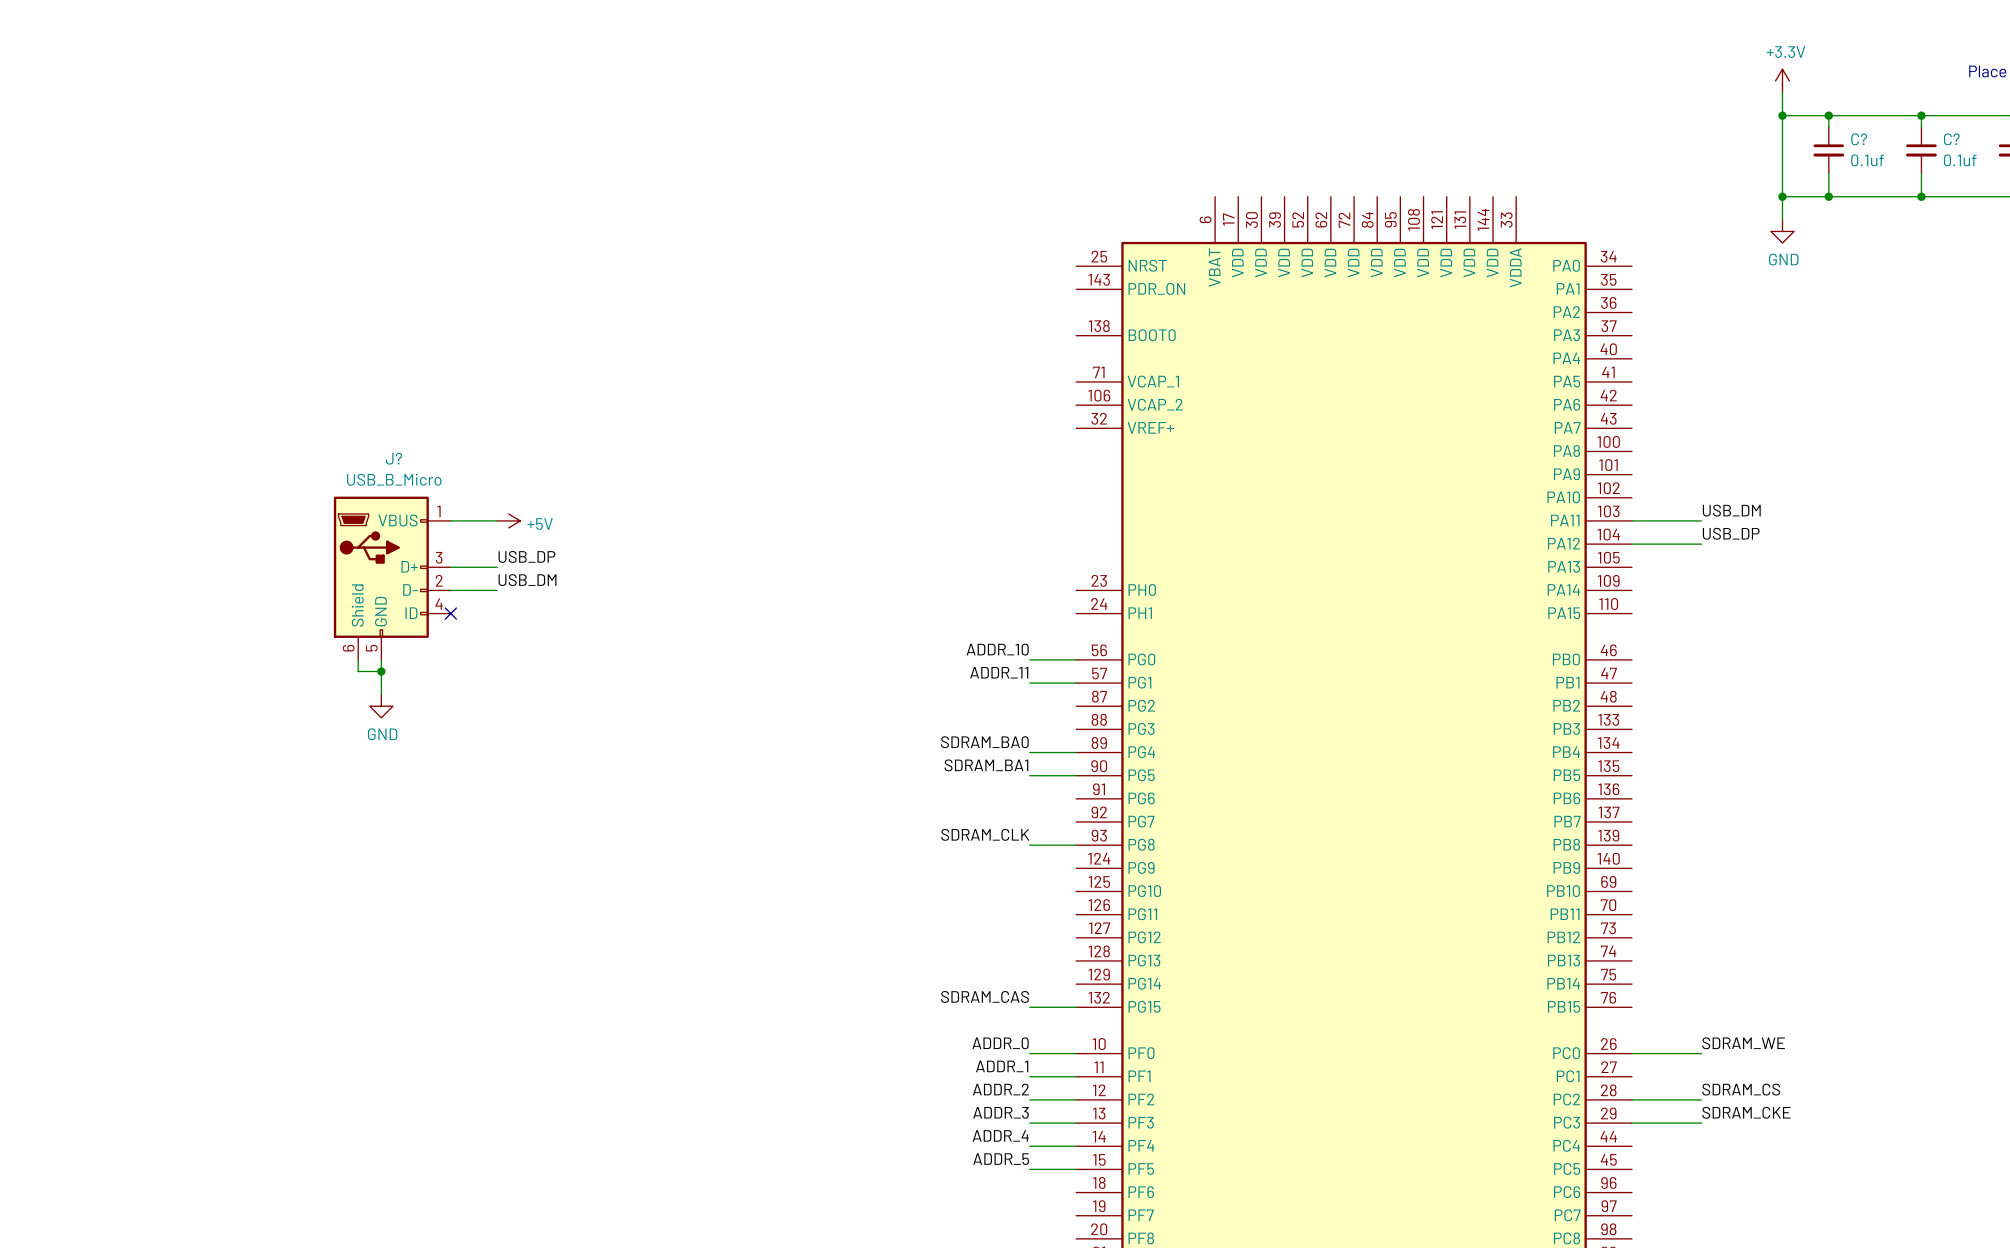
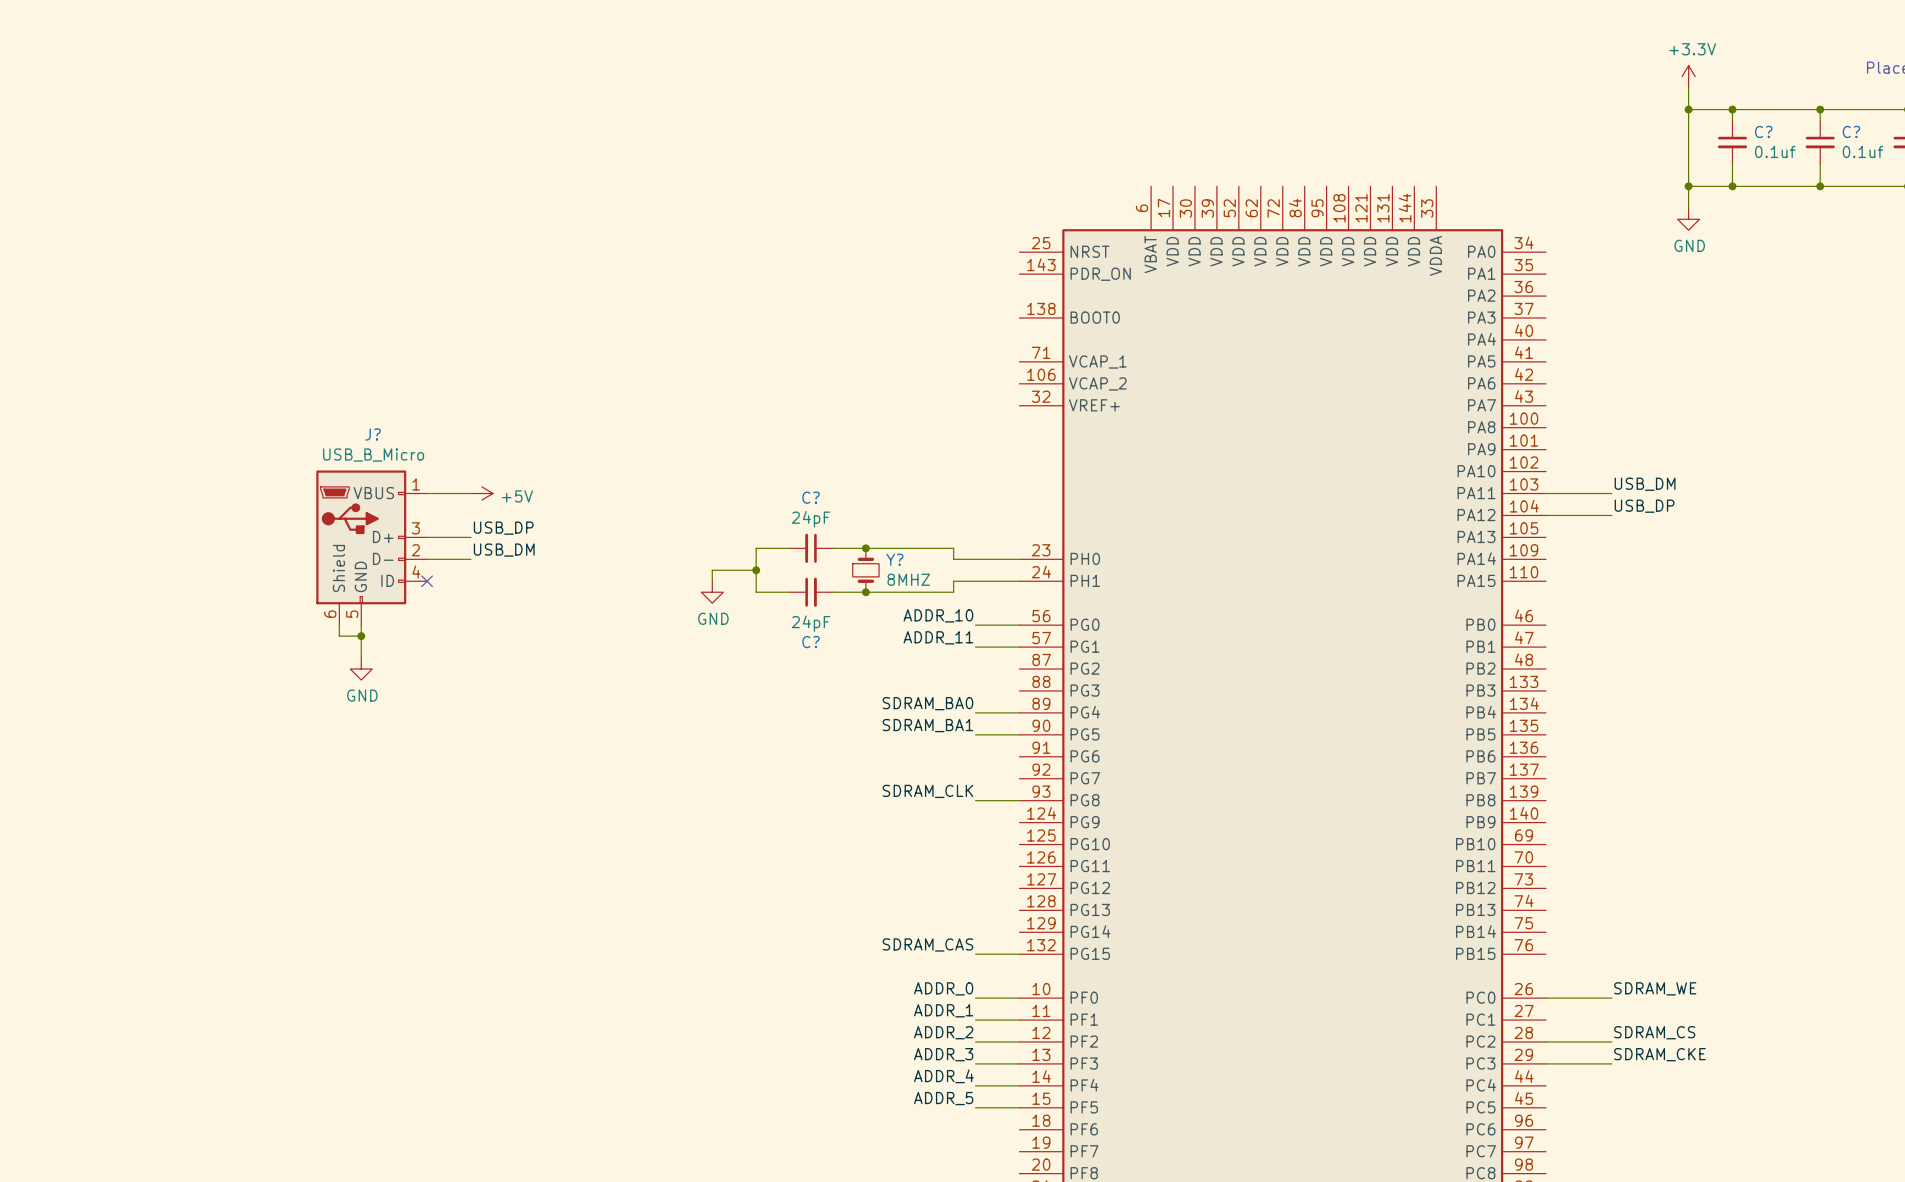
wire: none -> (789, 548) (756, 548) (756, 592) (789, 592)
C?: none -> 24pF (811, 548)
wire: none -> (832, 548) (953, 548) (953, 559) (1019, 559)
junction: none -> (865, 548)
wire: none -> (756, 570) (712, 570) (712, 581)
junction: none -> (756, 570)
Y?: none -> 8MHZ (865, 570)
wire: none -> (1019, 581) (953, 581) (953, 592) (832, 592)
power symbol: none -> GND (712, 592)
C?: none -> 24pF (811, 592)
junction: none -> (865, 592)

